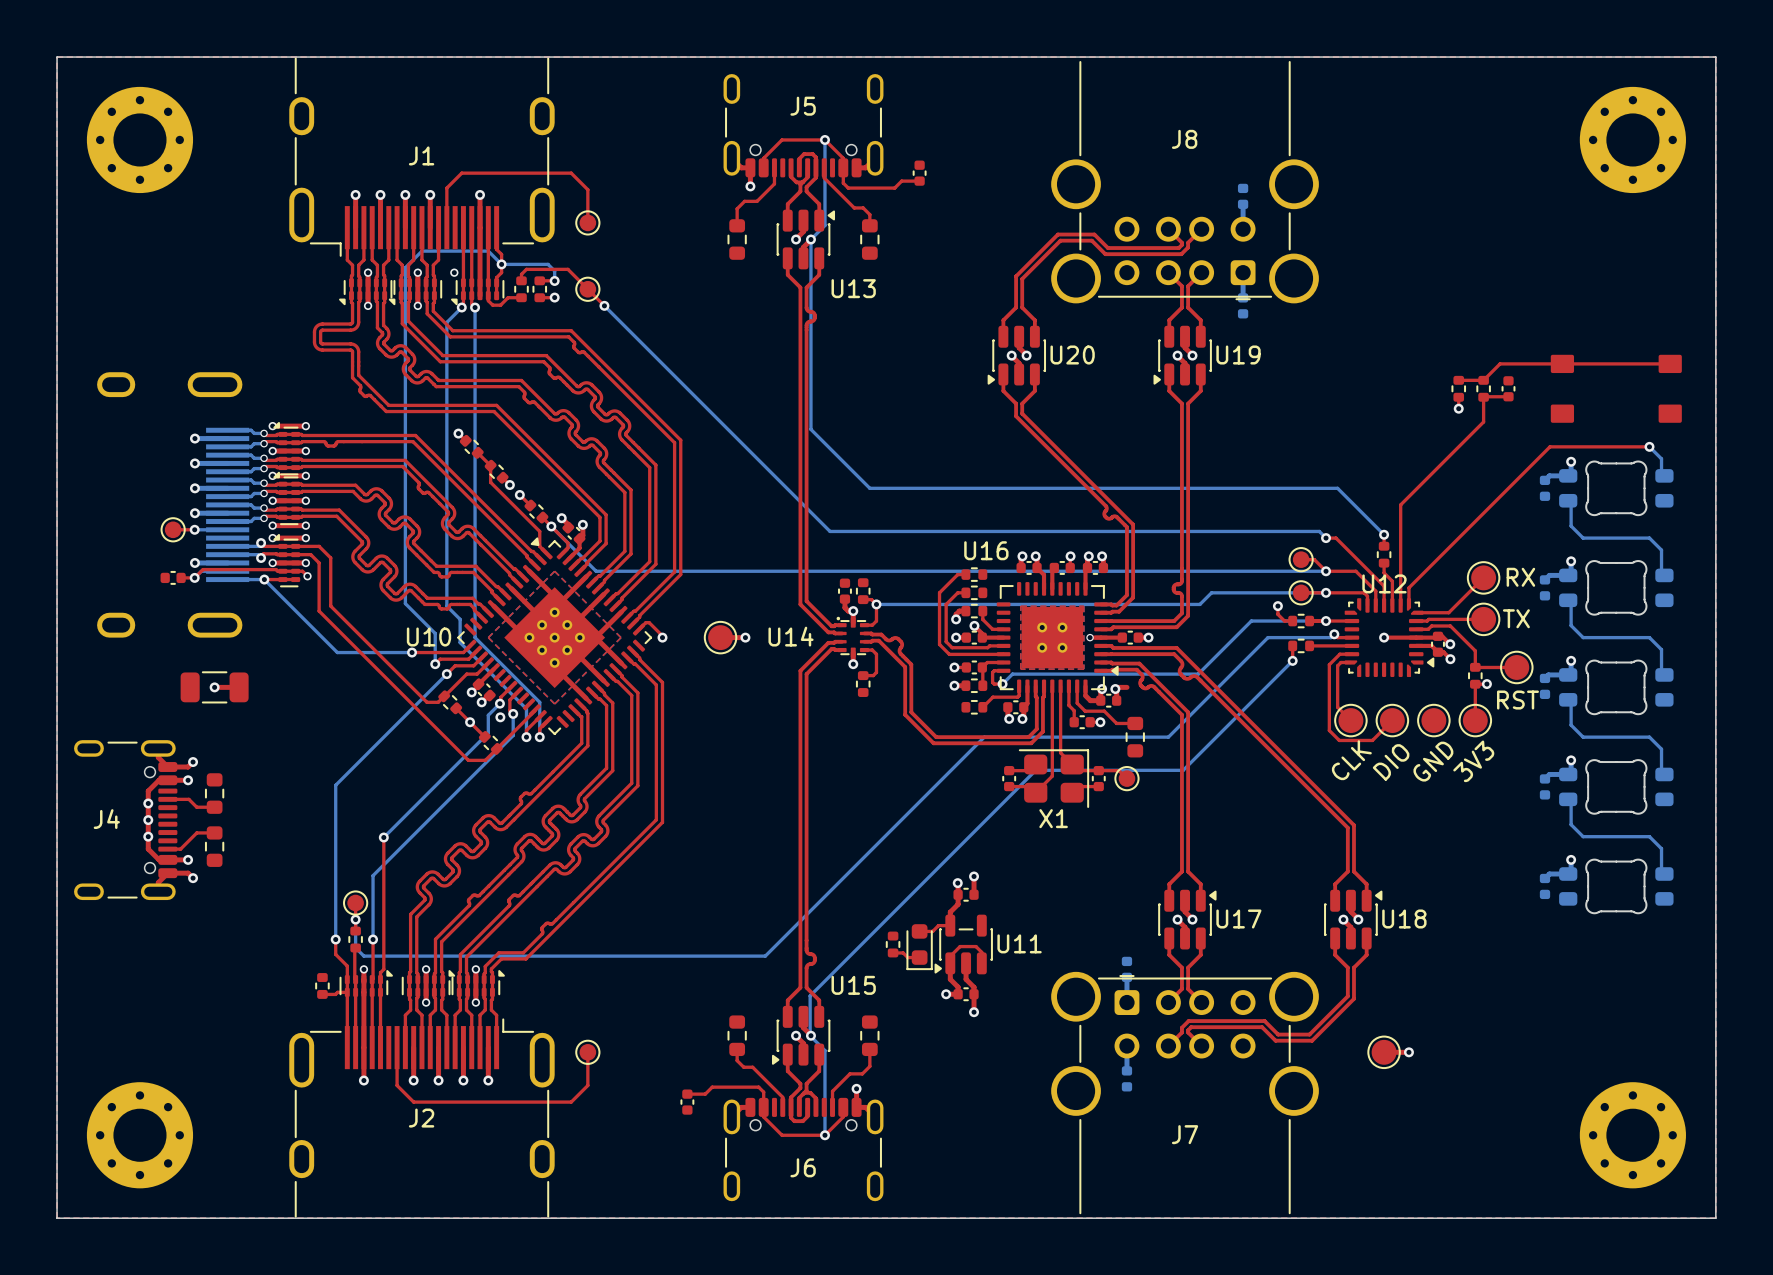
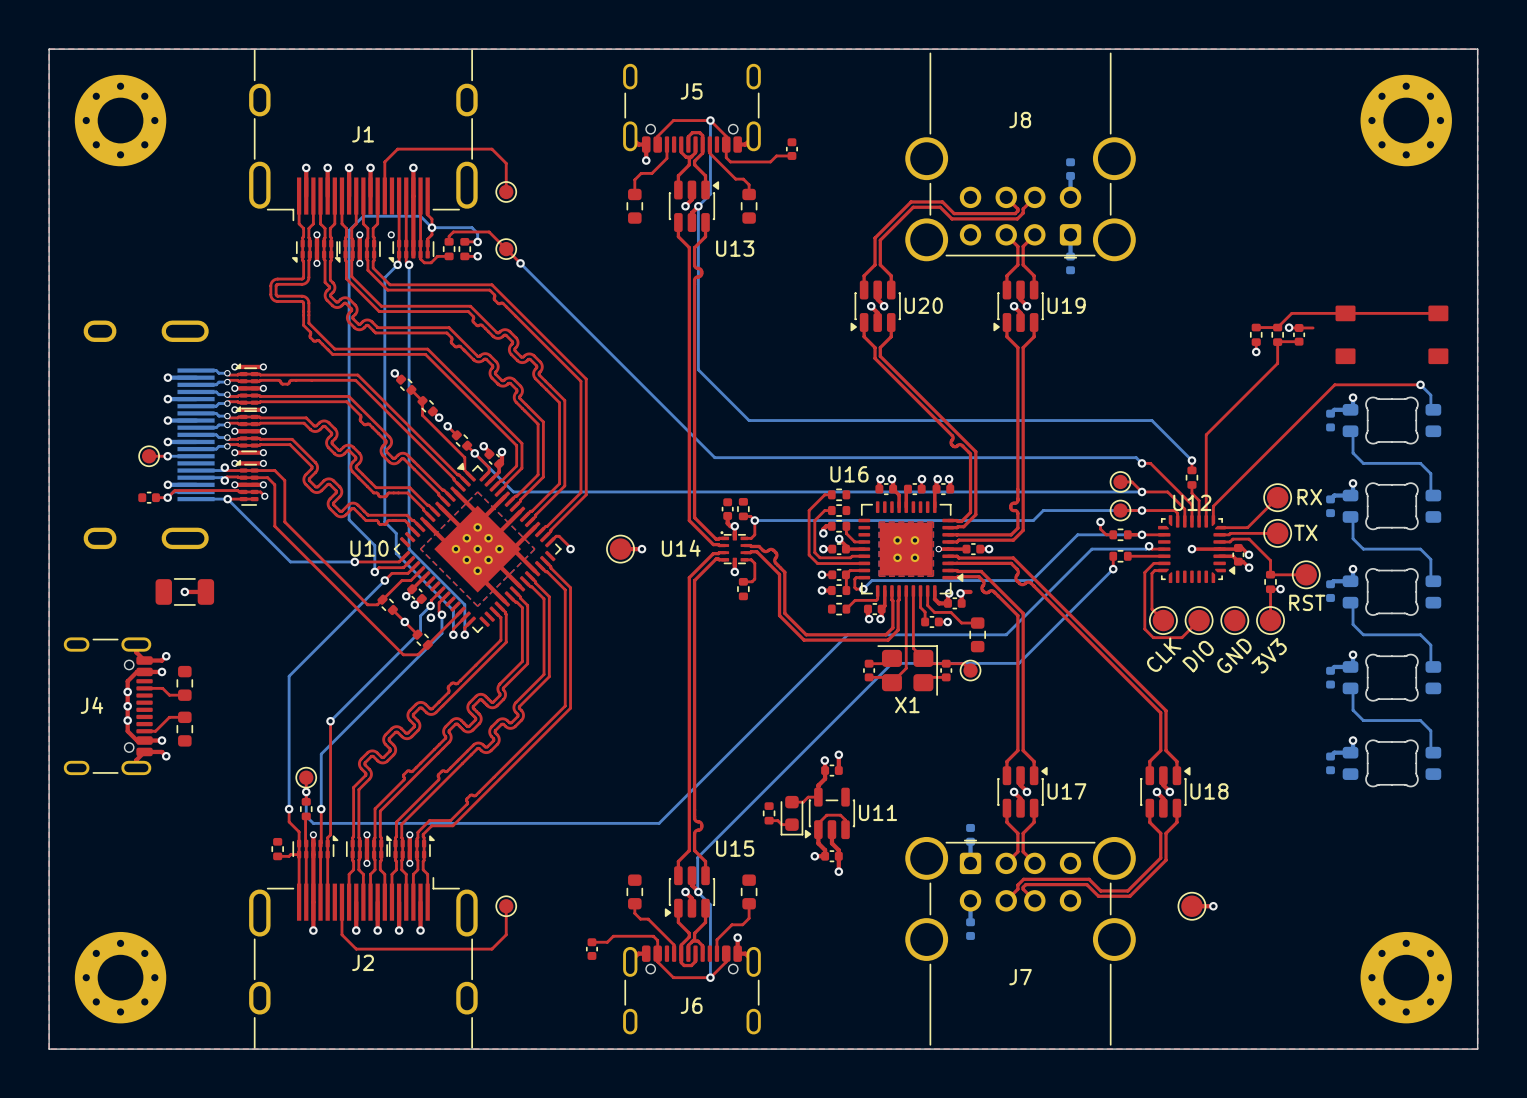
top track: none -> (1289, 327) (1313, 327)
via: none -> (1289, 327)

